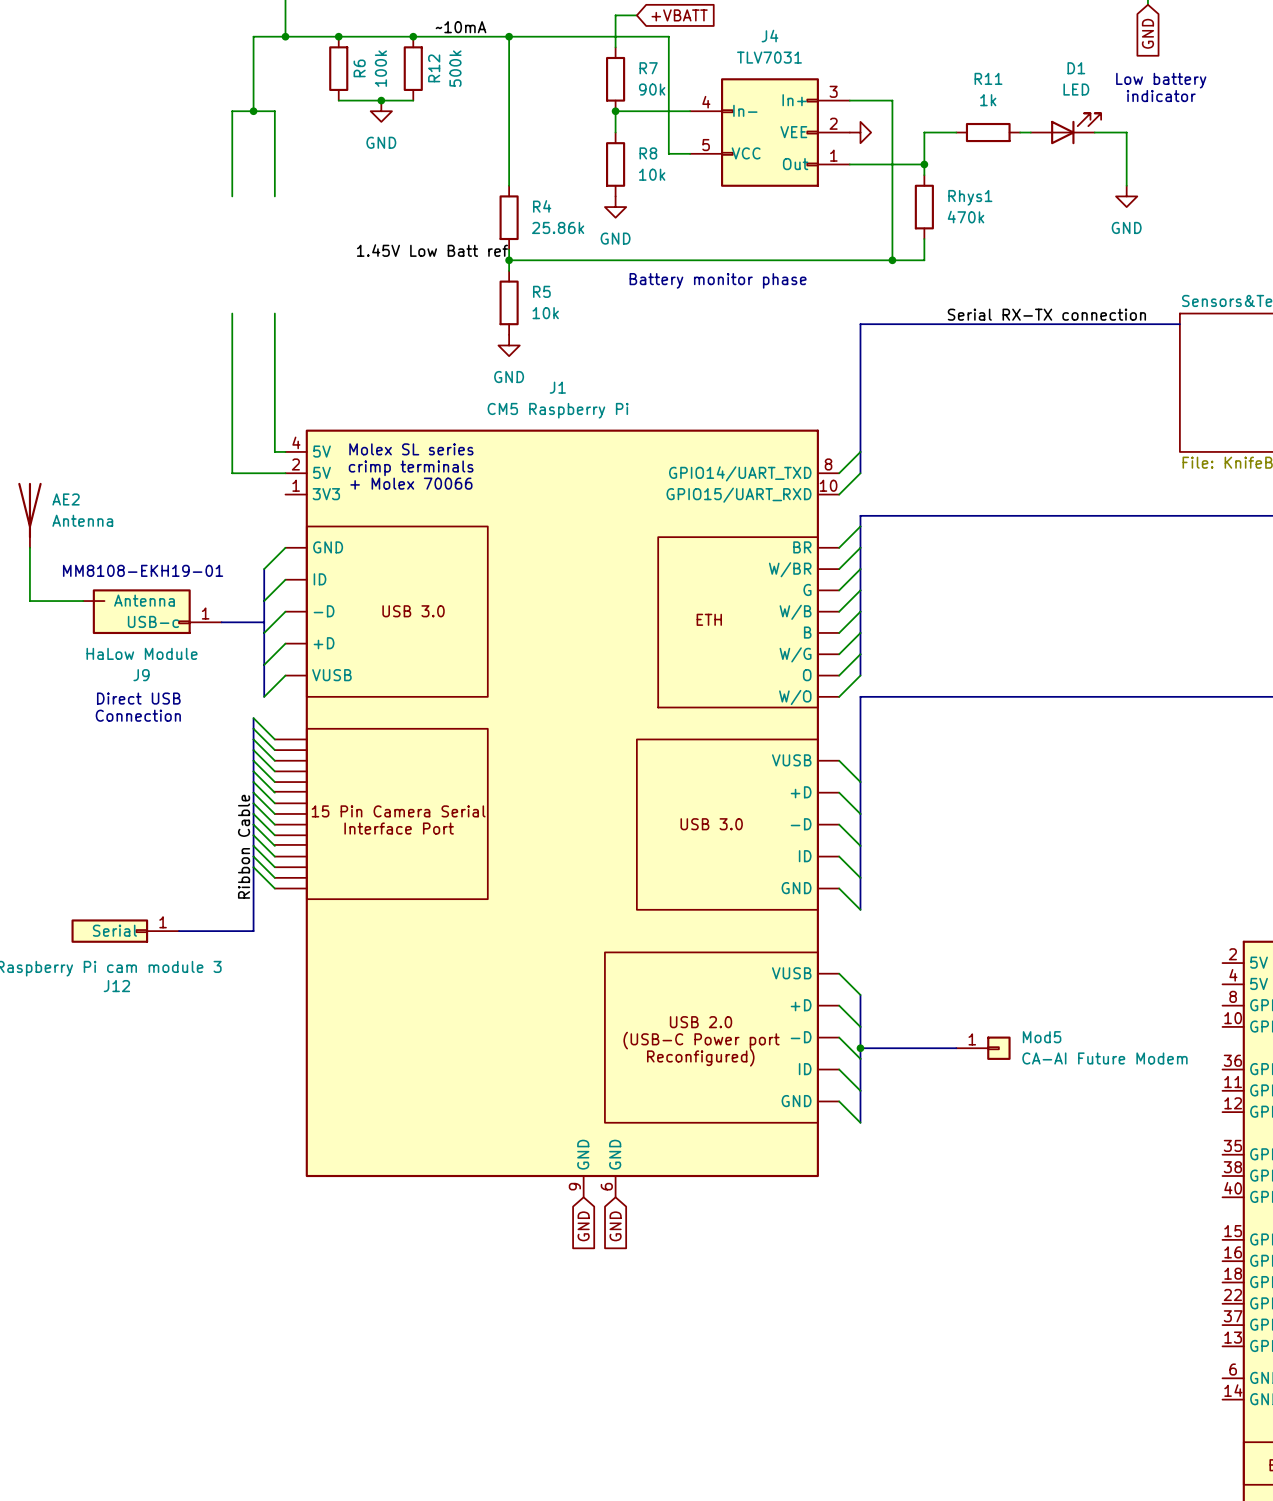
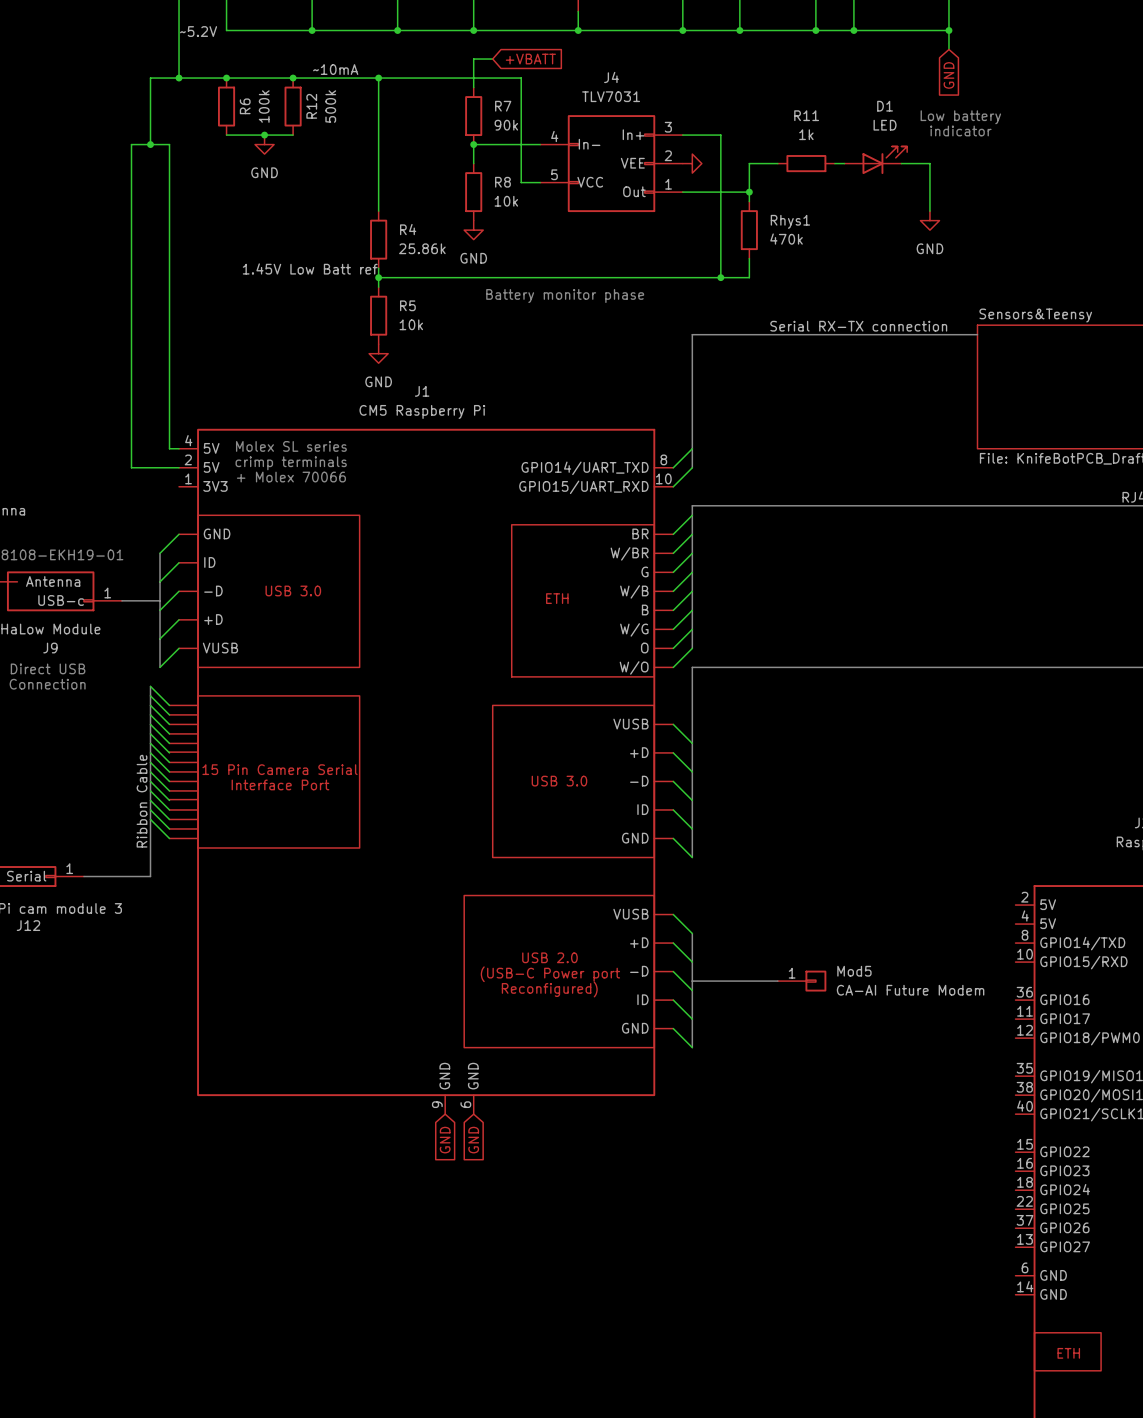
wire: none -> (131, 220) (131, 325)
wire: none -> (169, 220) (169, 325)
junction: (860, 1048) -> none

